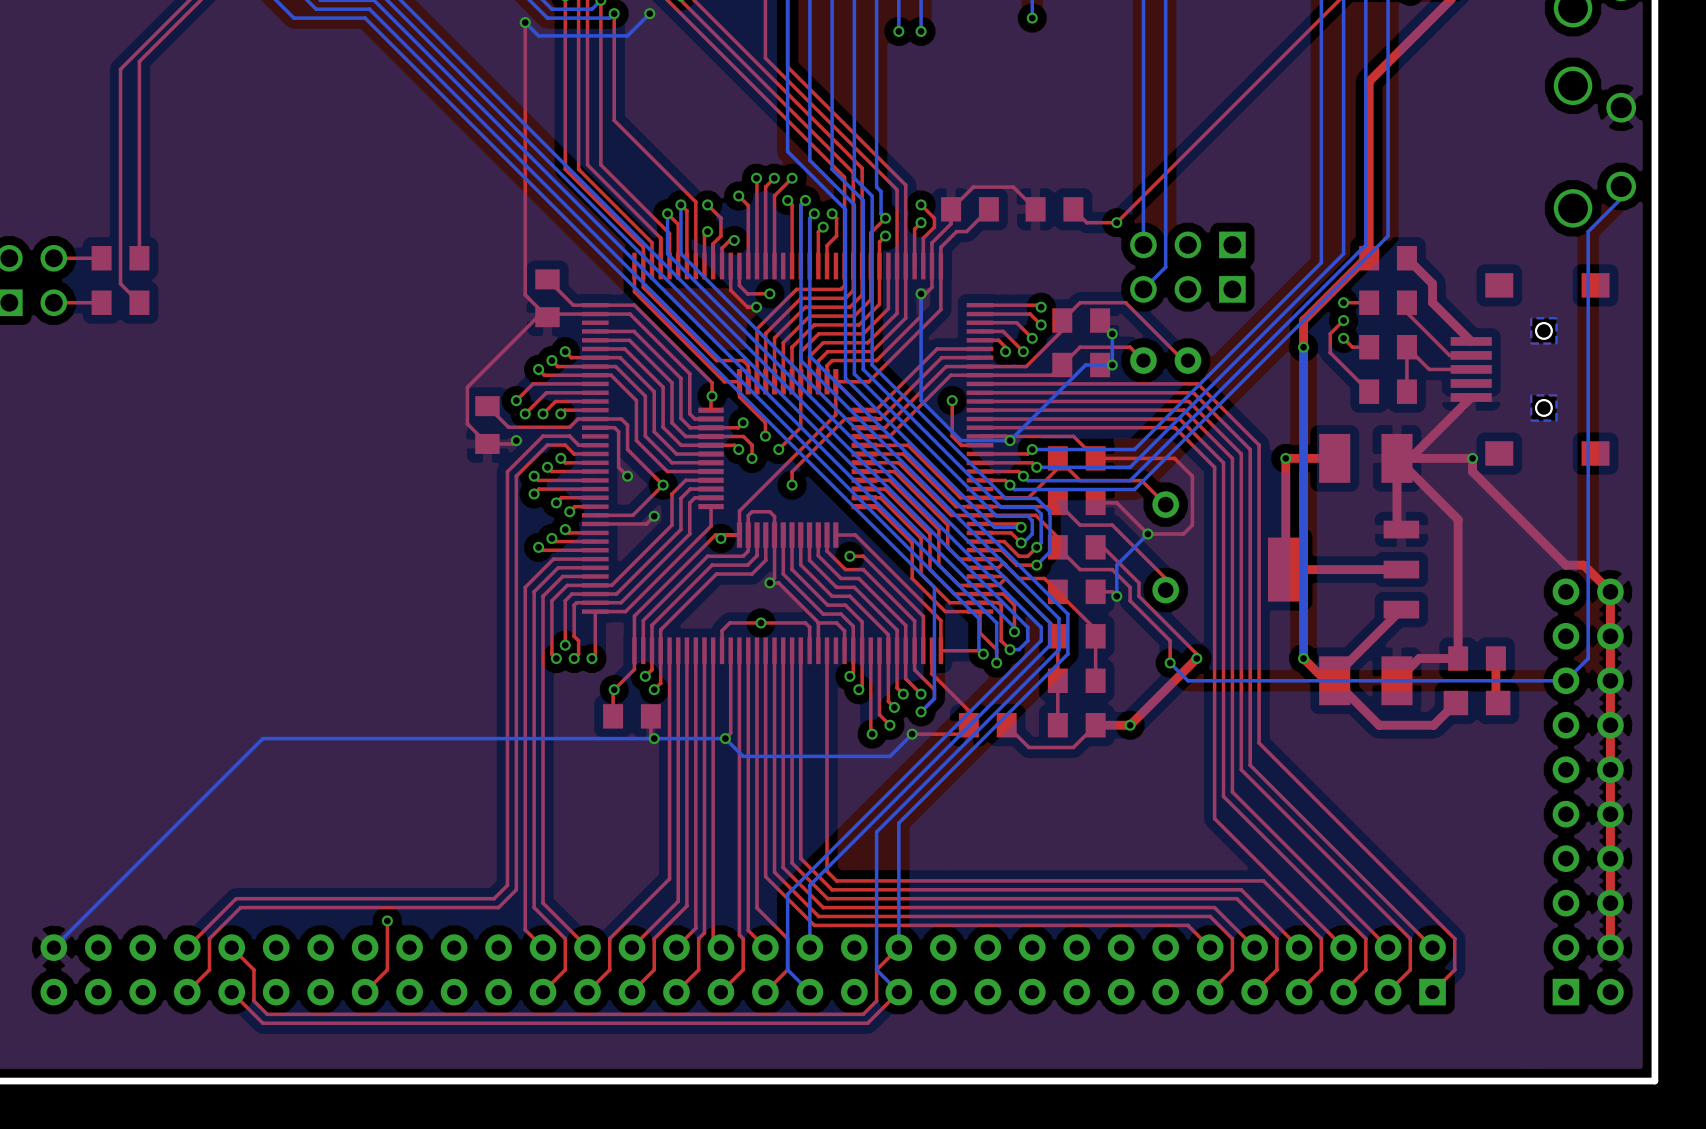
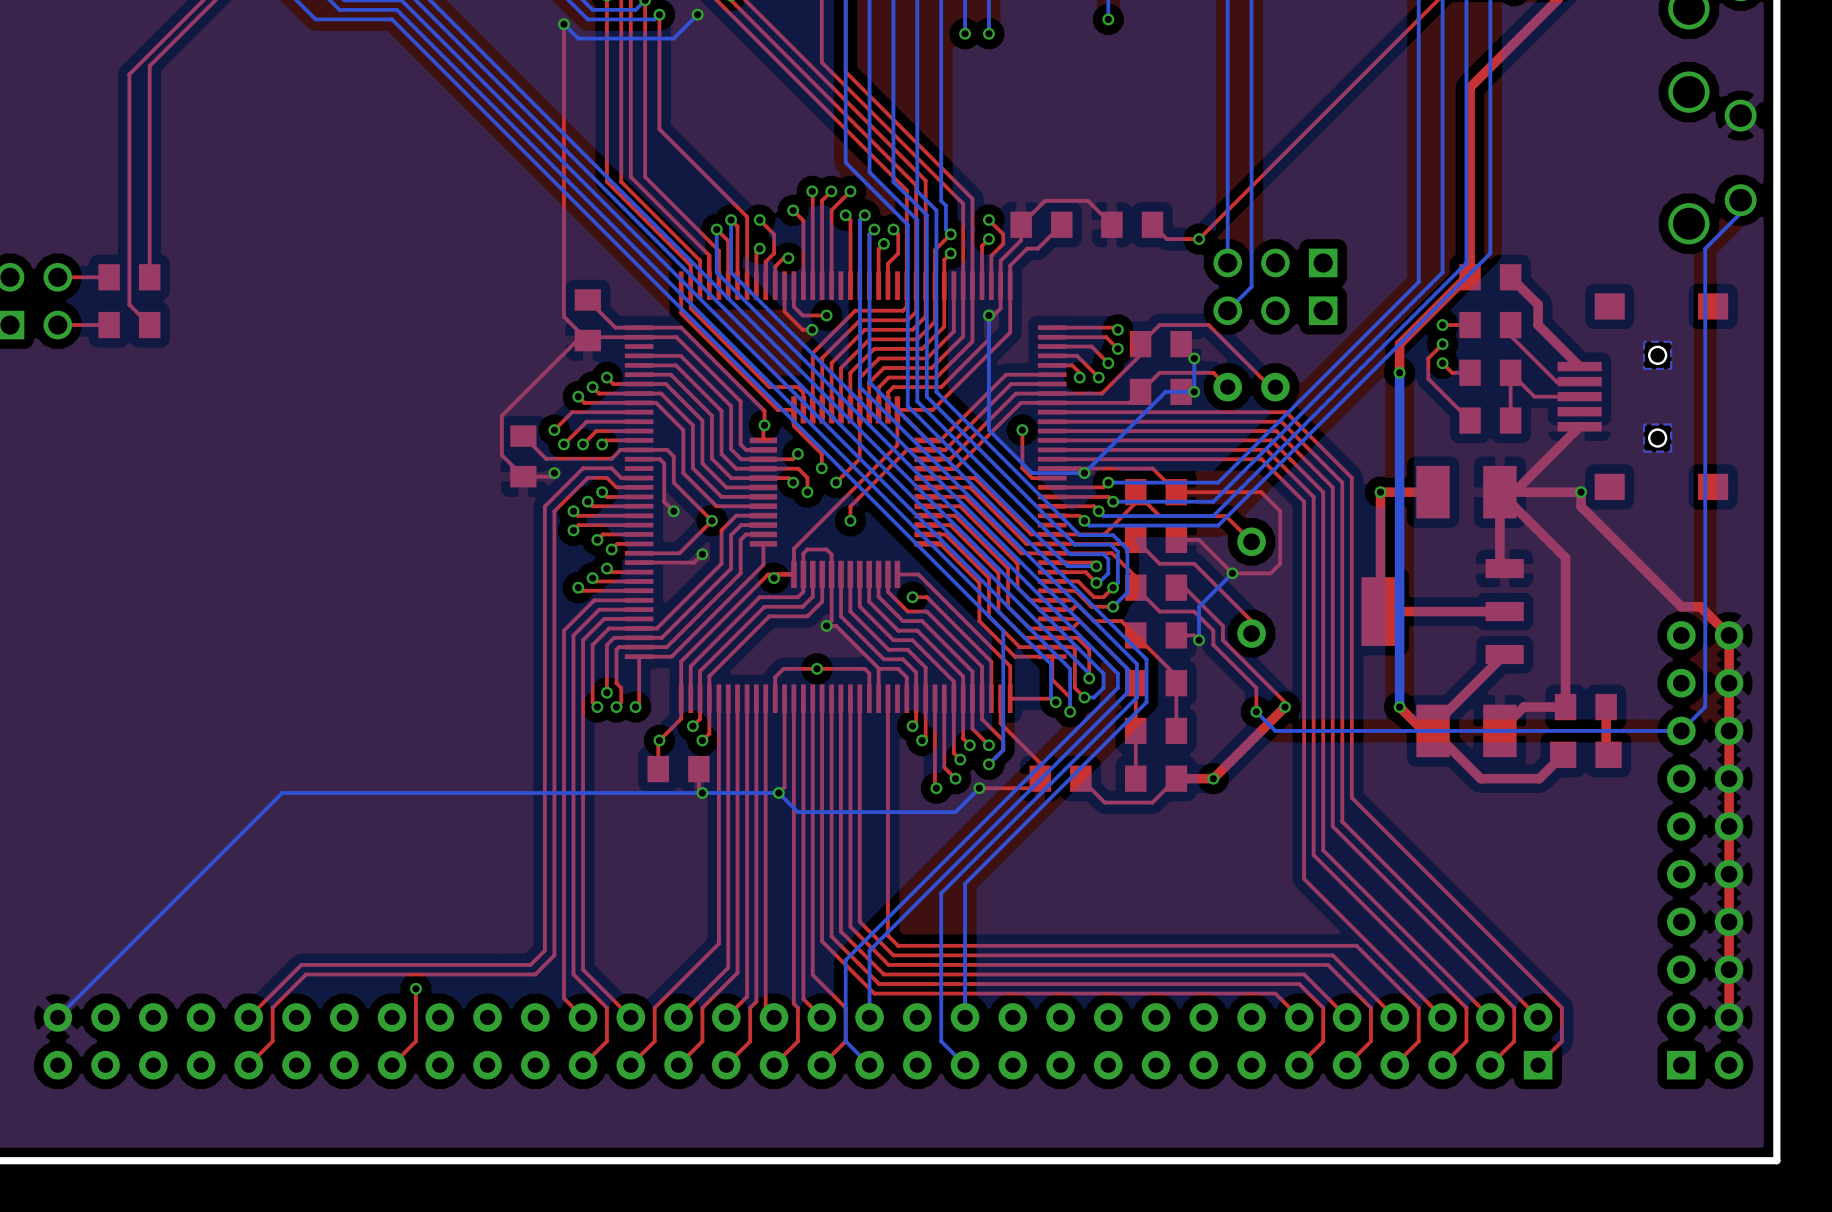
top track: (280, 898) (236, 898) (187, 947) -> (301, 964) (248, 1017)
top track: (285, 907) (240, 907) (209, 938) (209, 969) (187, 992) -> (306, 974) (272, 1007) (272, 1041) (248, 1065)
top track: (898, 947) (876, 969) (876, 1000) (863, 1014) (267, 1014) (253, 1000) (253, 969) (231, 947) -> none
top track: (898, 992) (867, 1023) (262, 1023) (231, 992) -> none

